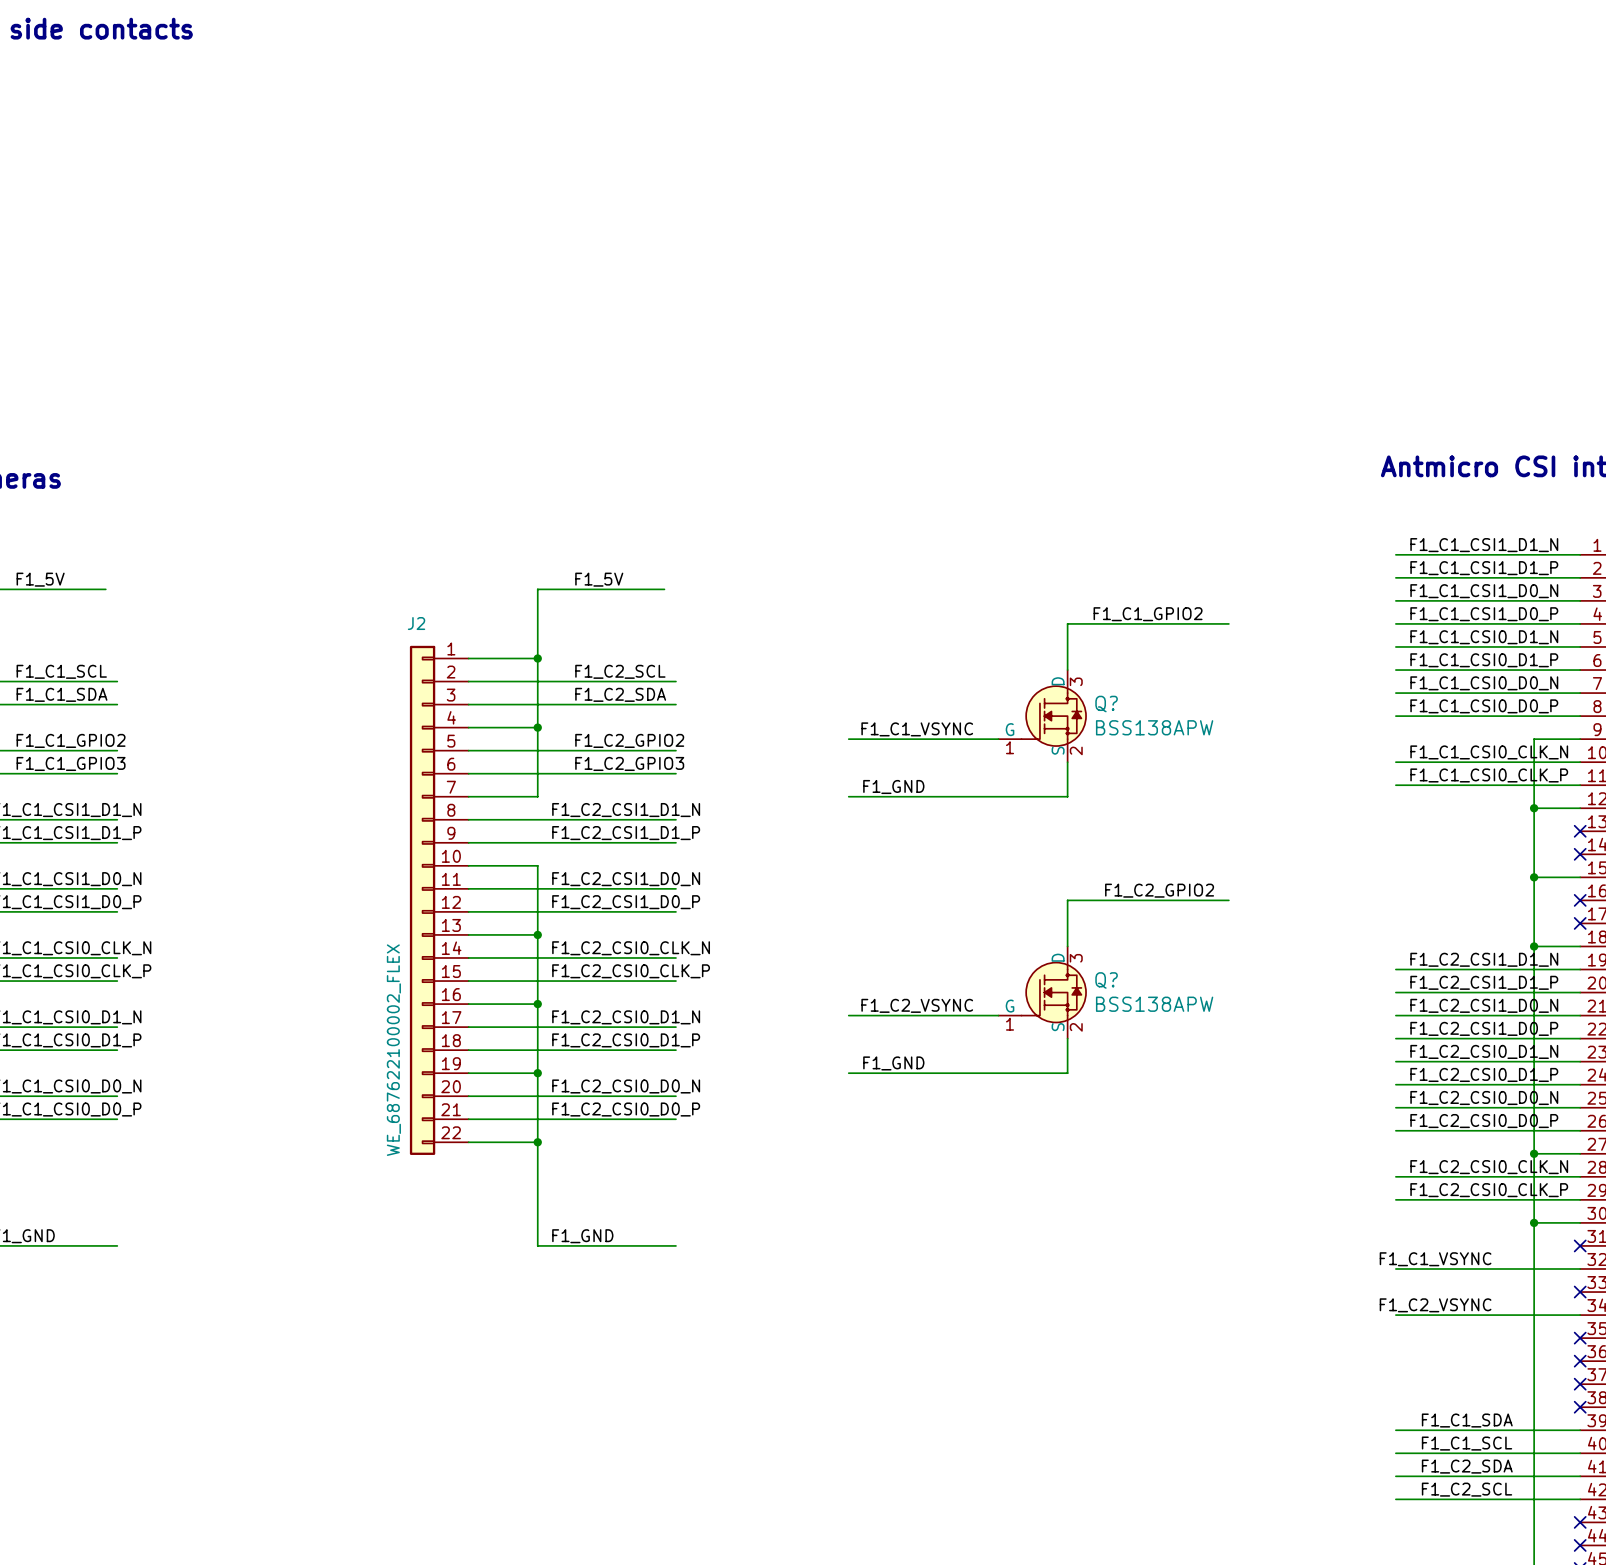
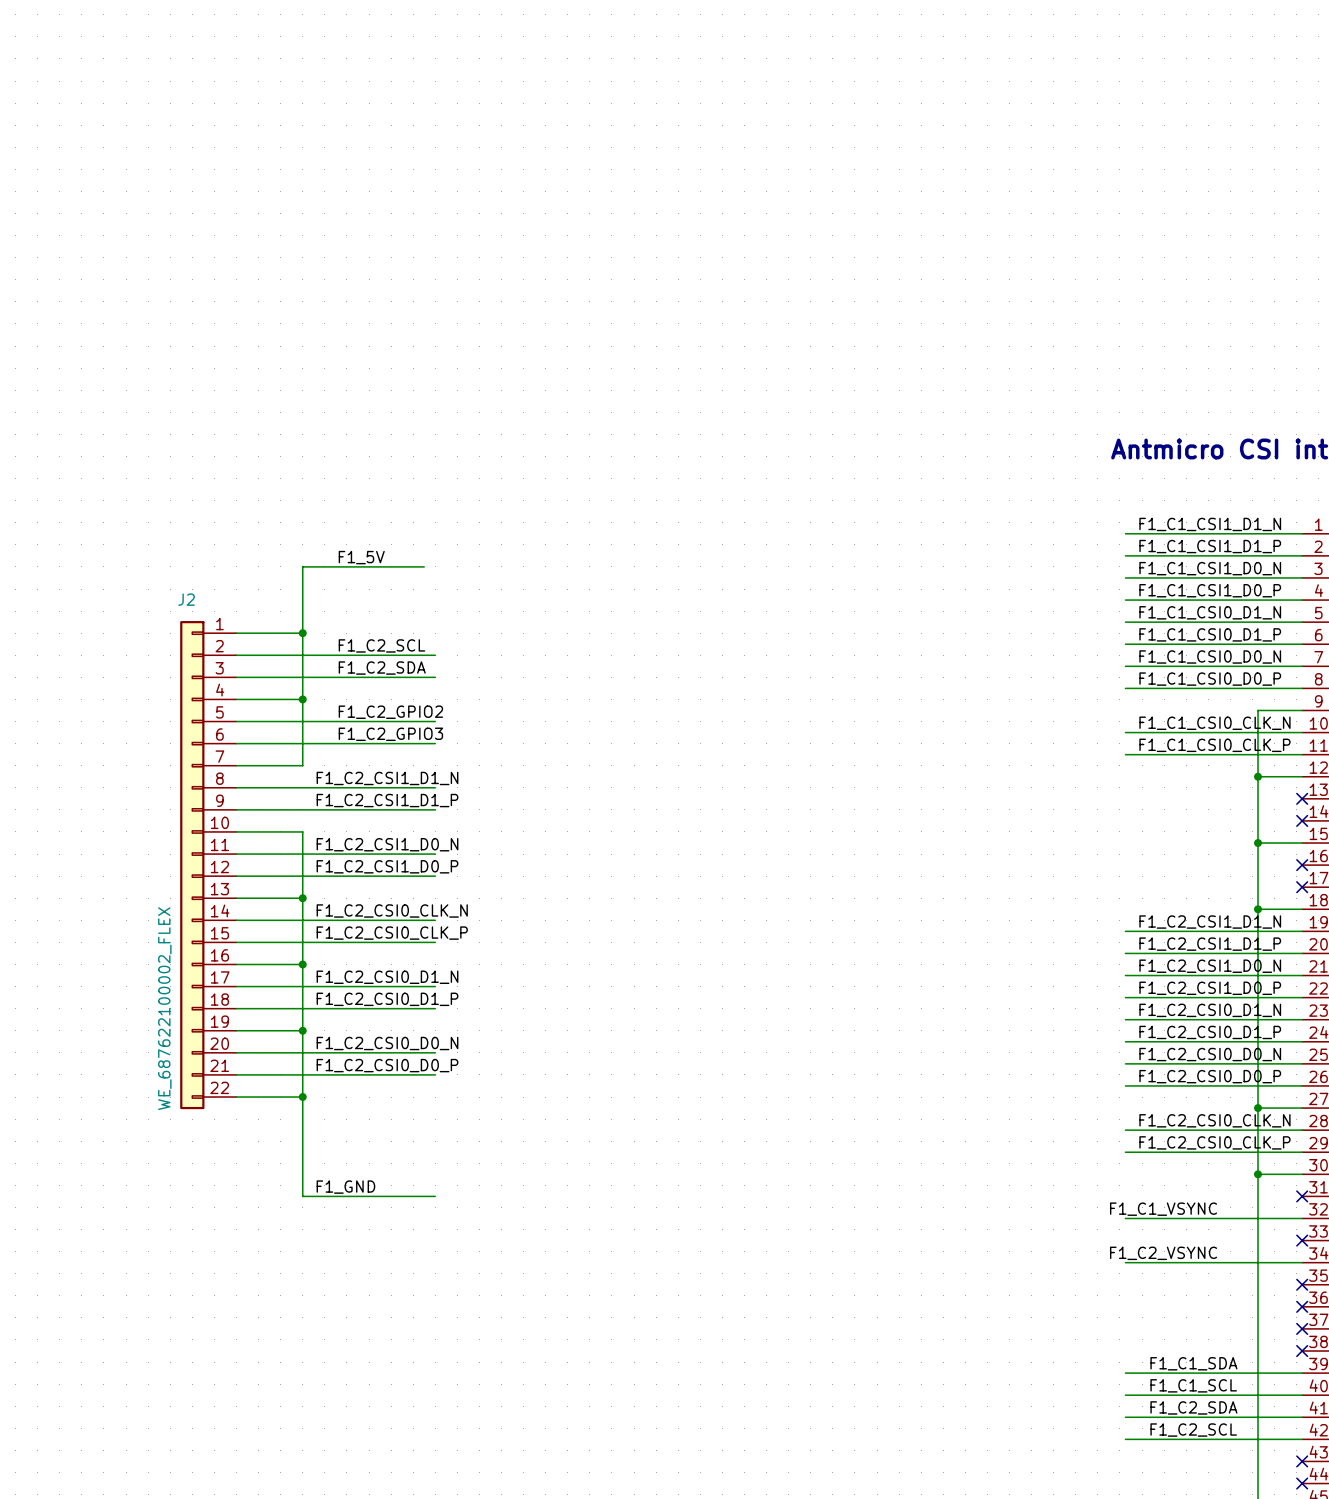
label: F1_C1_GPIO2 (1148, 614) -> none
wire: (1228, 623) (1067, 623) (1067, 670) -> none
Q?: BSS138APW (1042, 716) -> none
label: F1_C1_VSYNC (917, 729) -> none
wire: (848, 739) (998, 739) -> none
wire: (1067, 762) (1067, 796) (848, 796) -> none
label: F1_GND (893, 786) -> none
label: F1_C2_GPIO2 (1159, 890) -> none
wire: (1228, 900) (1067, 900) (1067, 946) -> none
Q?: BSS138APW (1042, 992) -> none
label: F1_C2_VSYNC (917, 1005) -> none
wire: (848, 1015) (998, 1015) -> none
wire: (1067, 1038) (1067, 1073) (848, 1073) -> none
label: F1_GND (893, 1063) -> none

